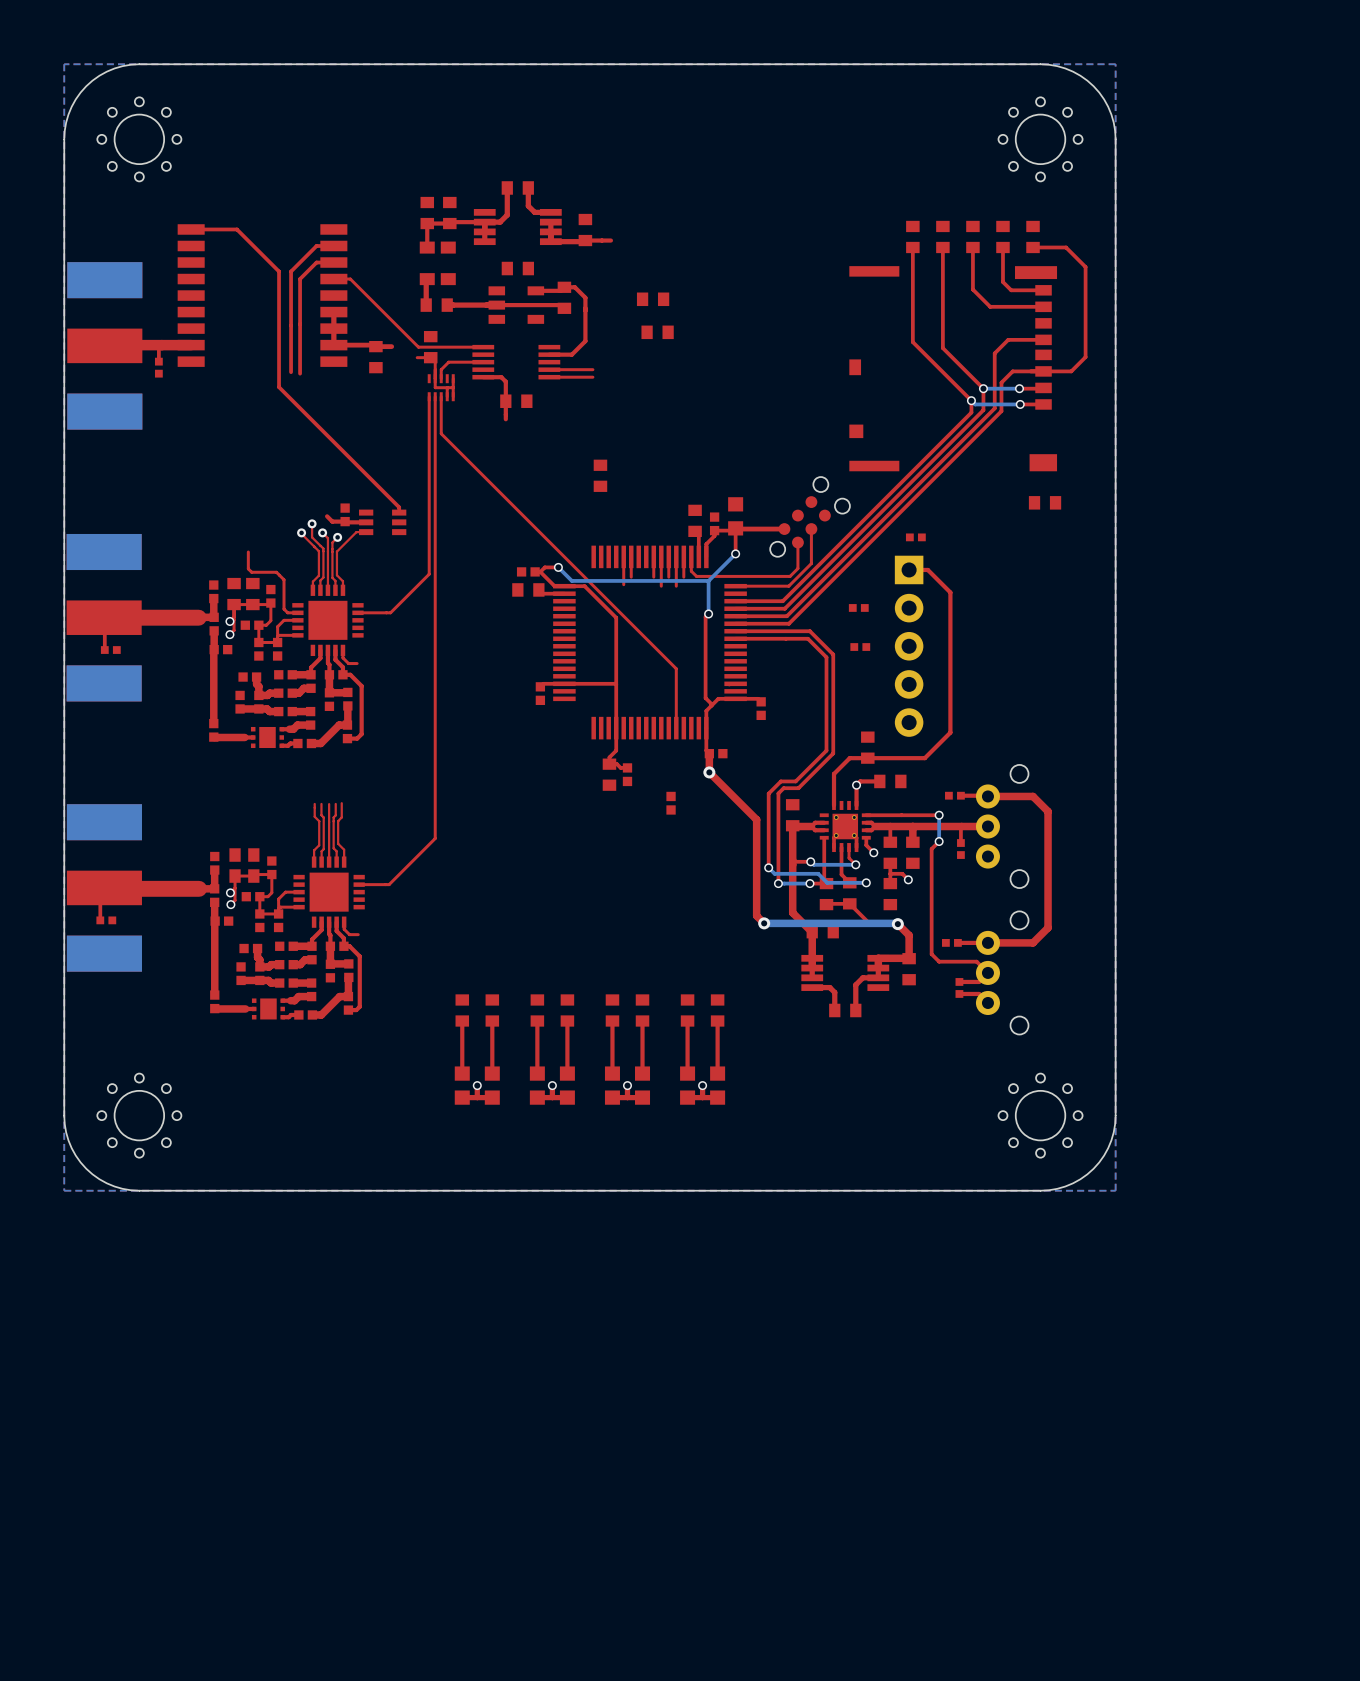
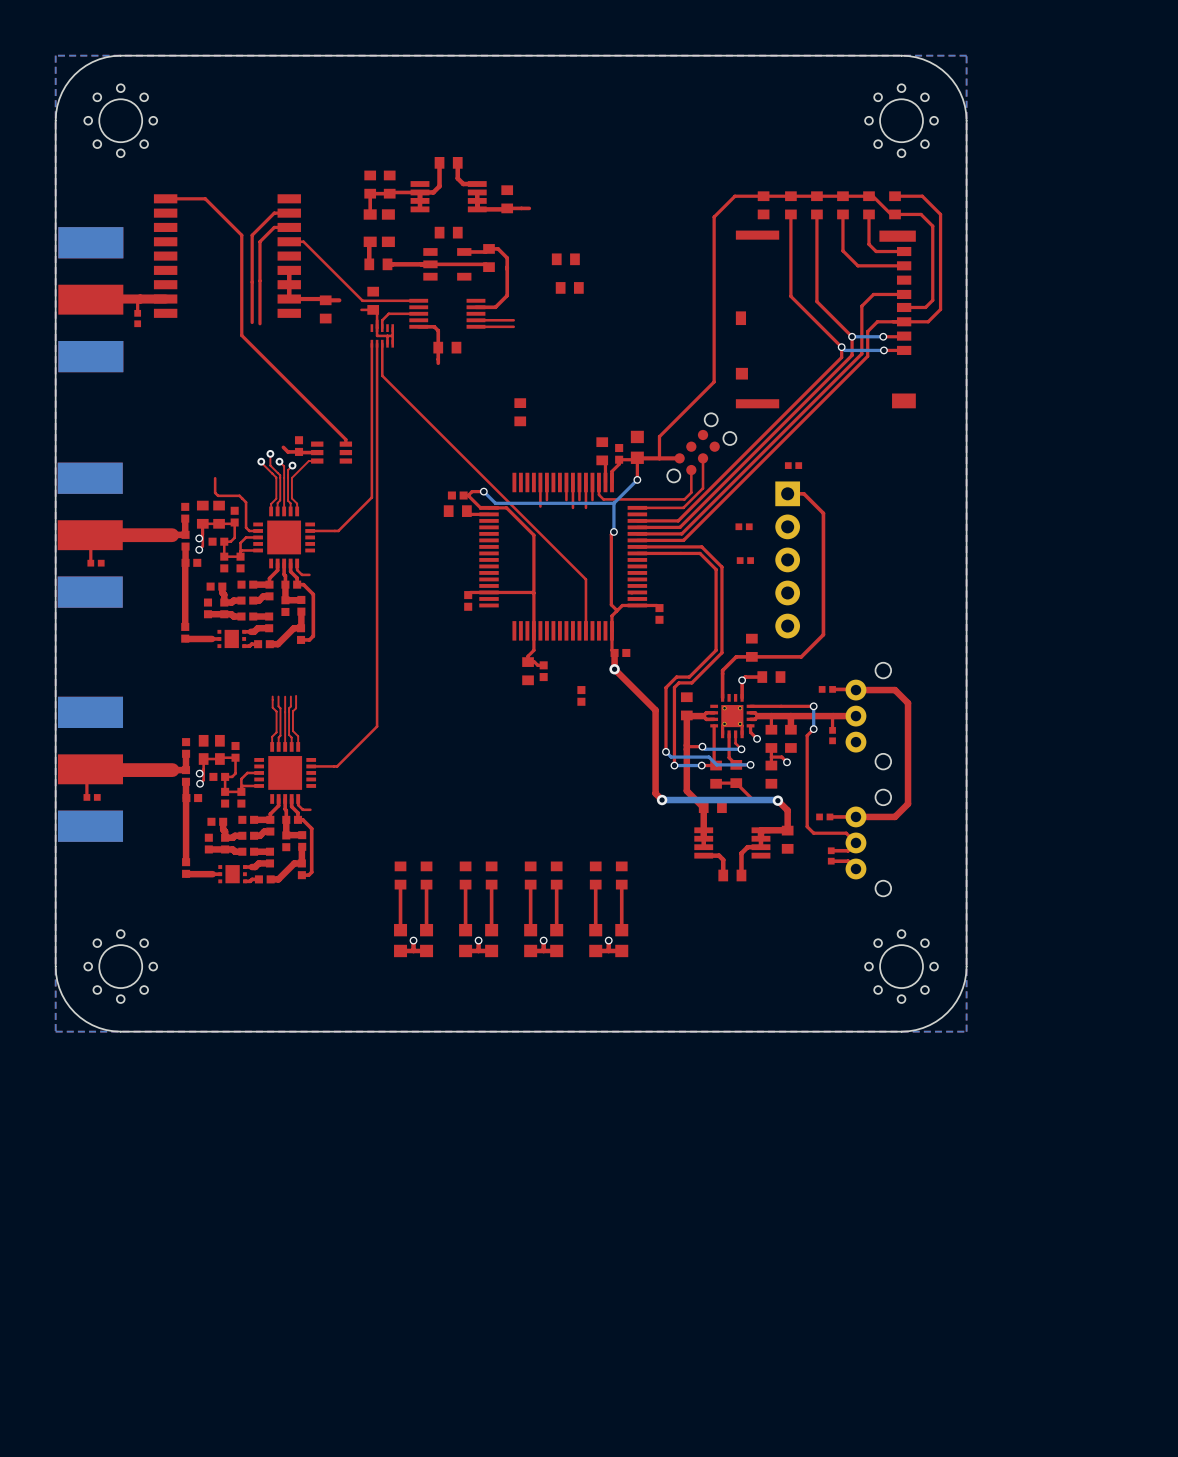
top track: none -> (895, 214) (891, 214) (872, 196) (734, 196) (714, 217) (714, 381) (659, 436) (659, 458)
top track: (1063, 247) (1066, 247) (1085, 267) -> (895, 196) (922, 196) (940, 214) (940, 231)
top track: none -> (921, 214) (932, 226) (932, 300) (925, 307) (904, 307)
part rotation: 0° (1045, 502) -> 90° clockwise (763, 205)
part position: (1045, 502) -> (763, 205)

